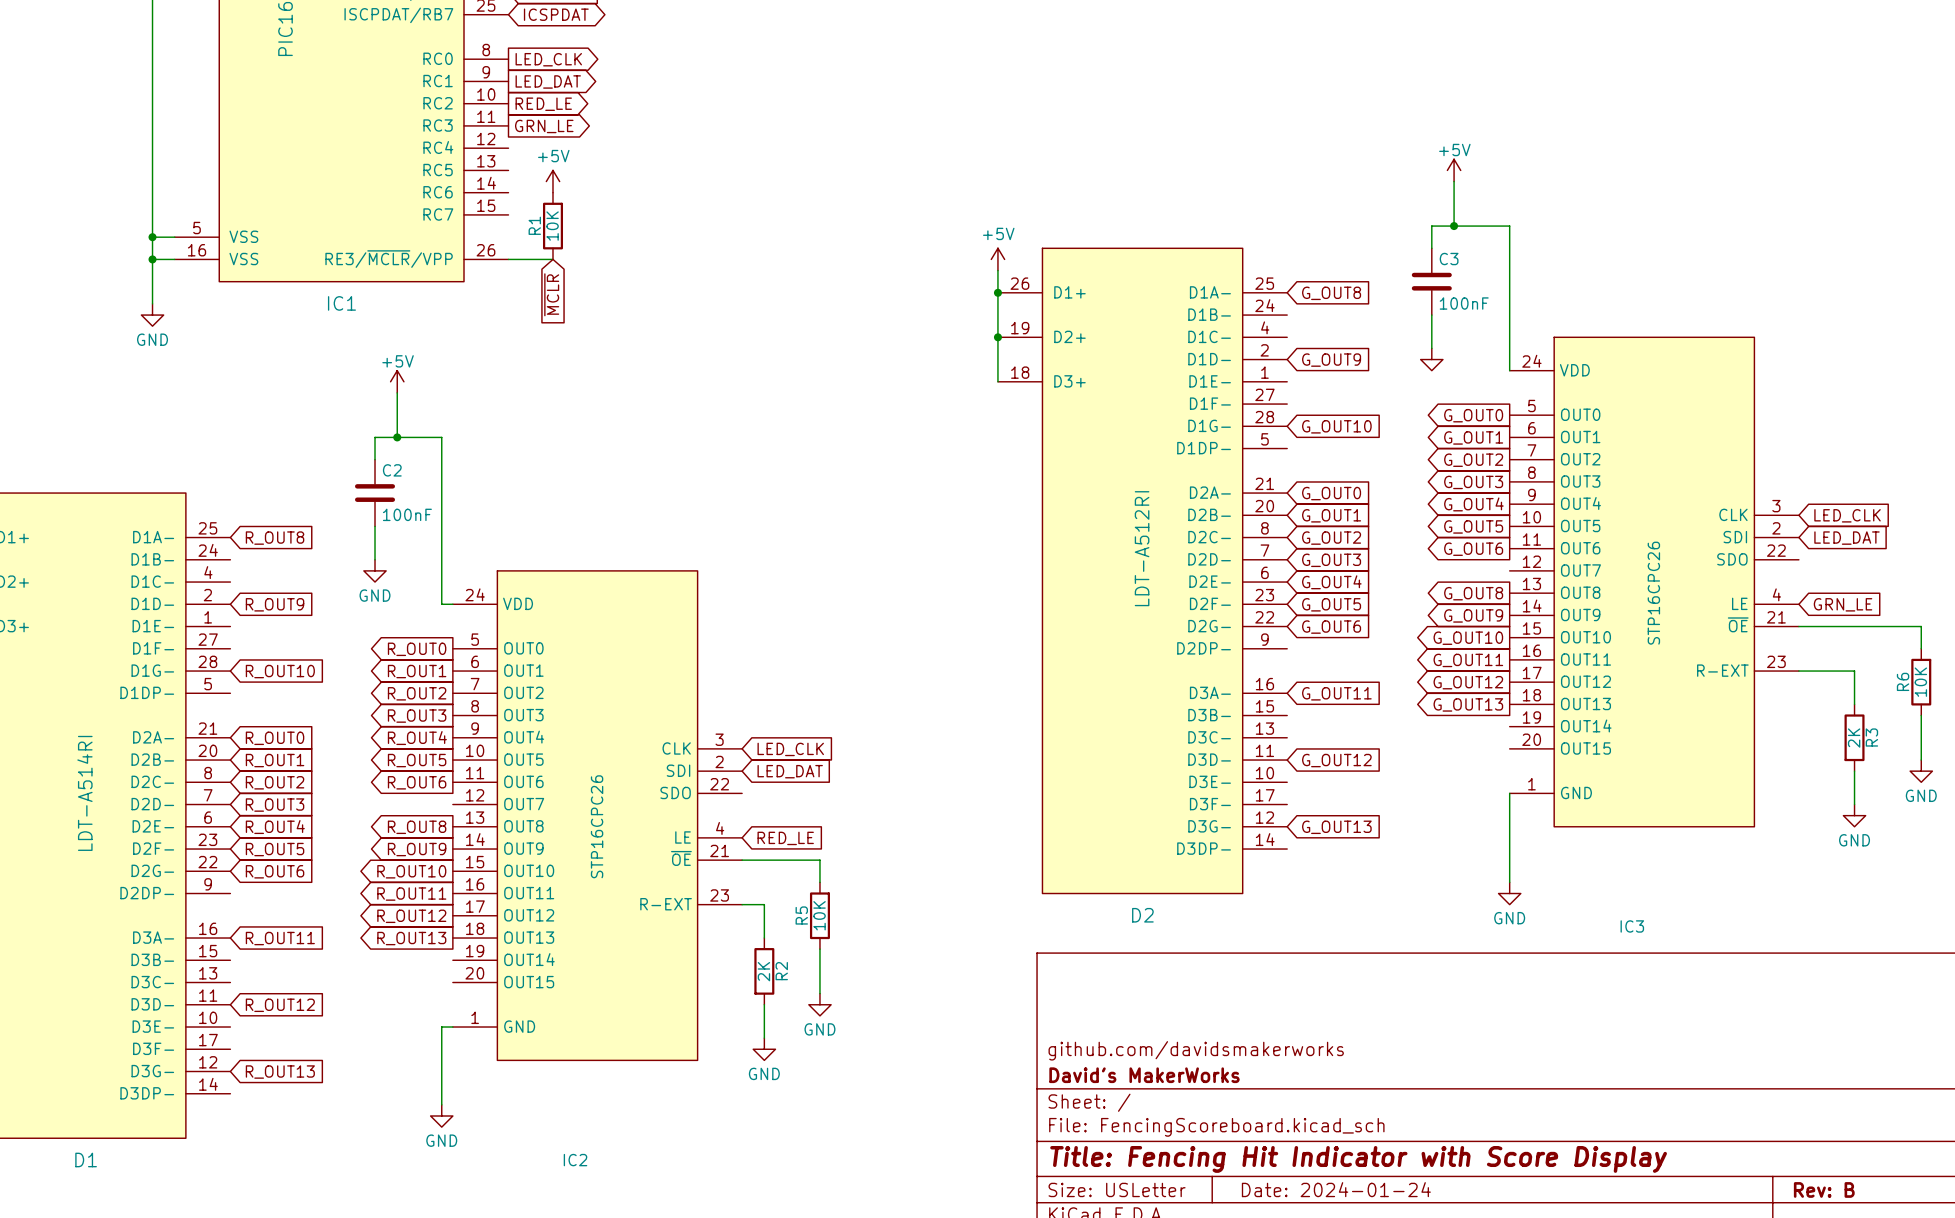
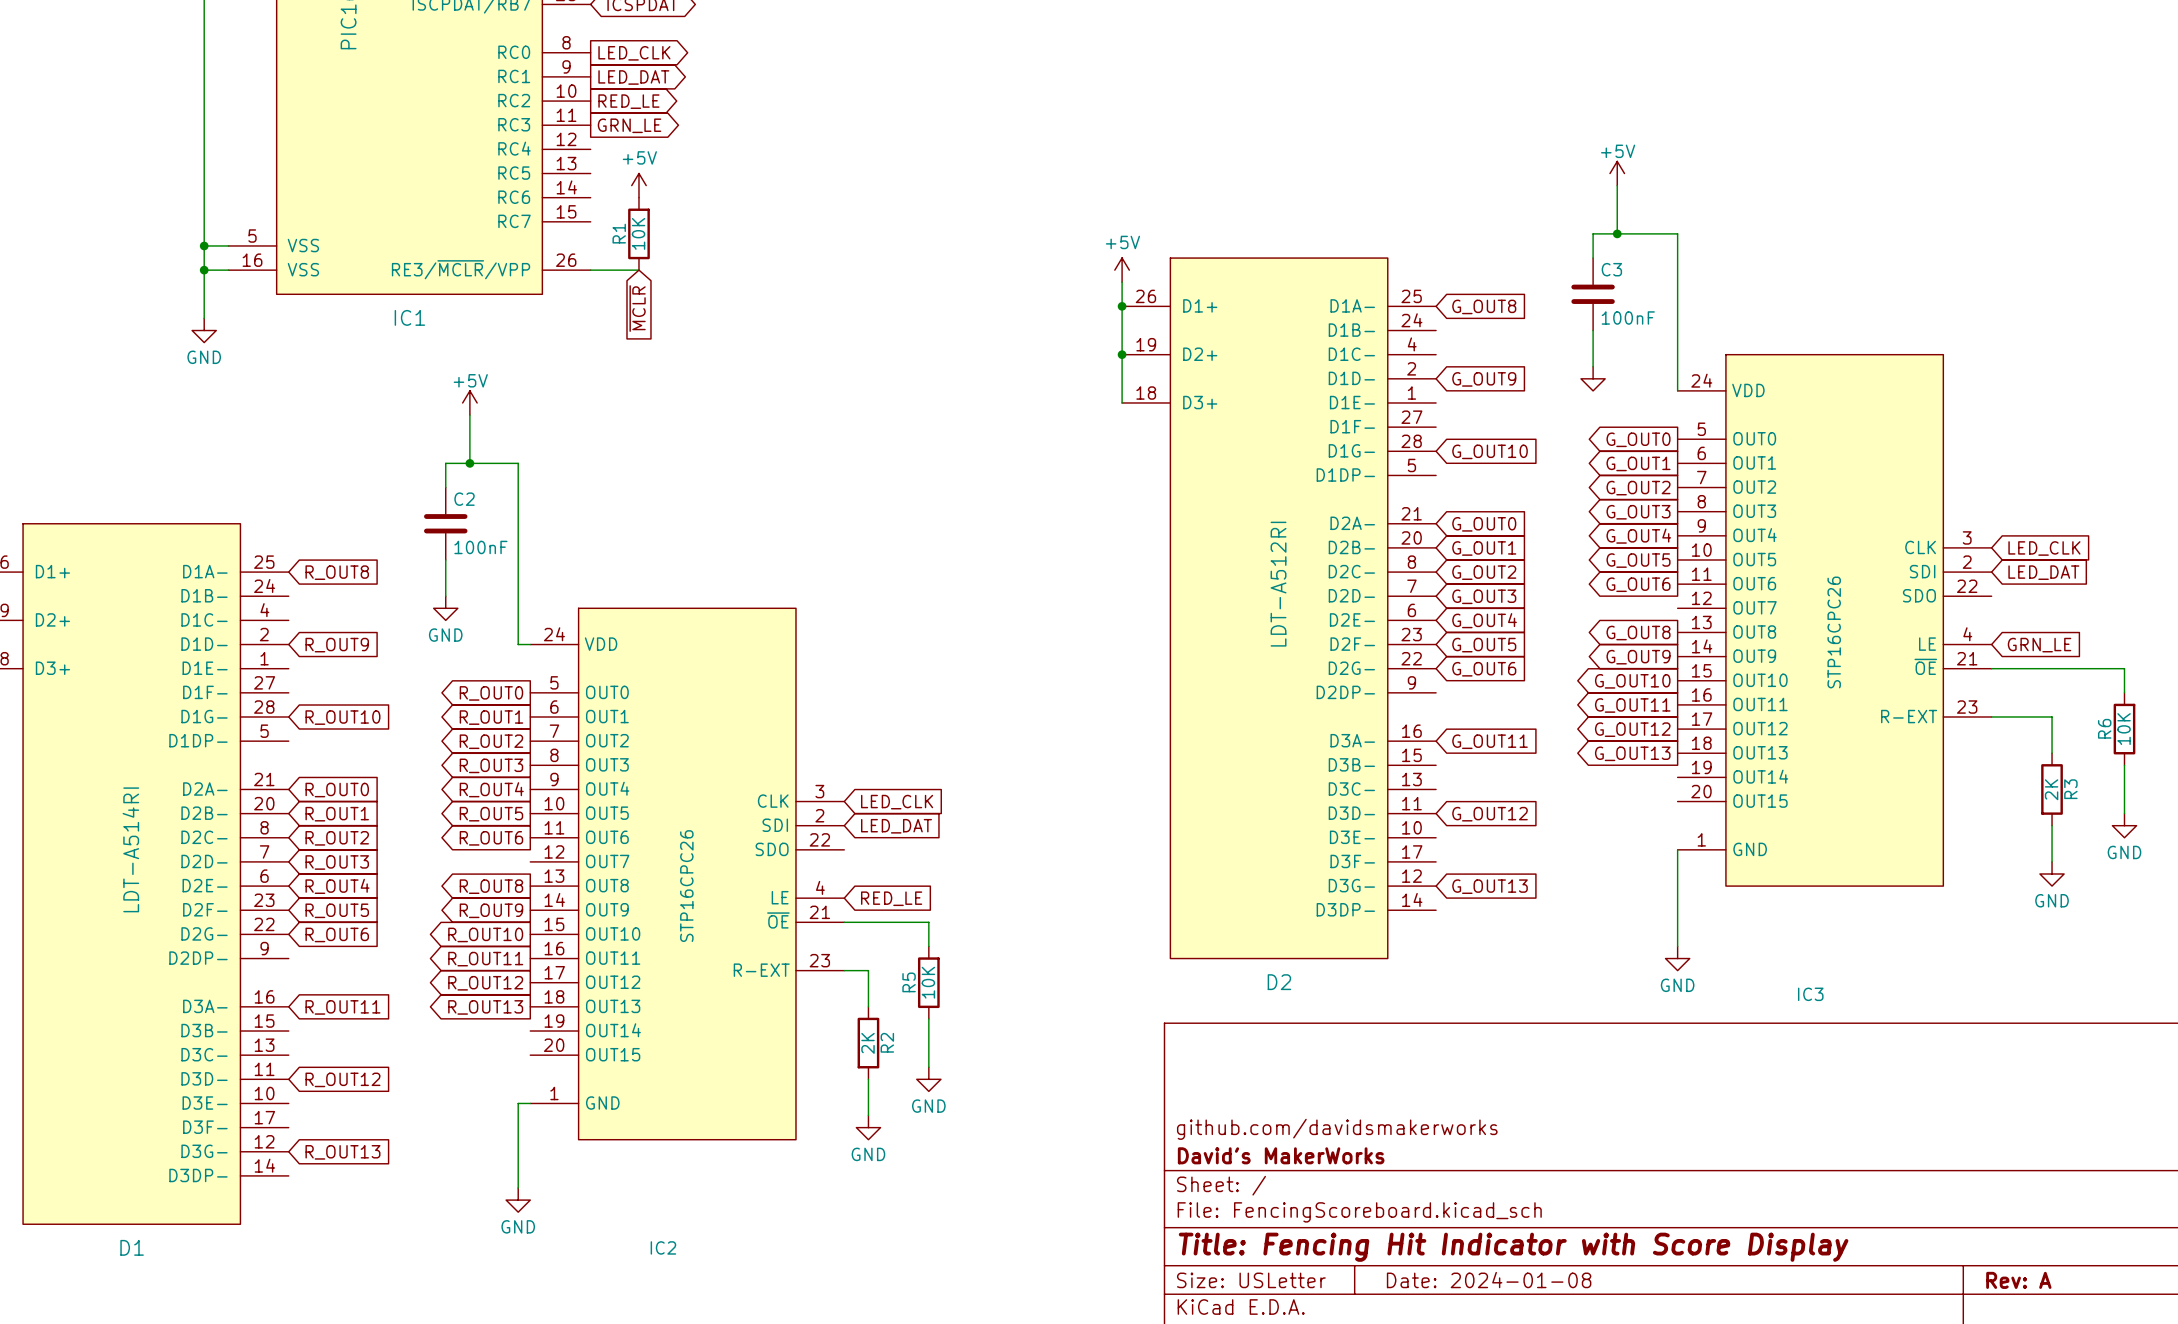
title block: Date: 2024-01-24 (1336, 1189) -> Date: 2024-01-08 (1489, 1280)
title block: Rev: B (1824, 1189) -> Rev: A (2018, 1280)

